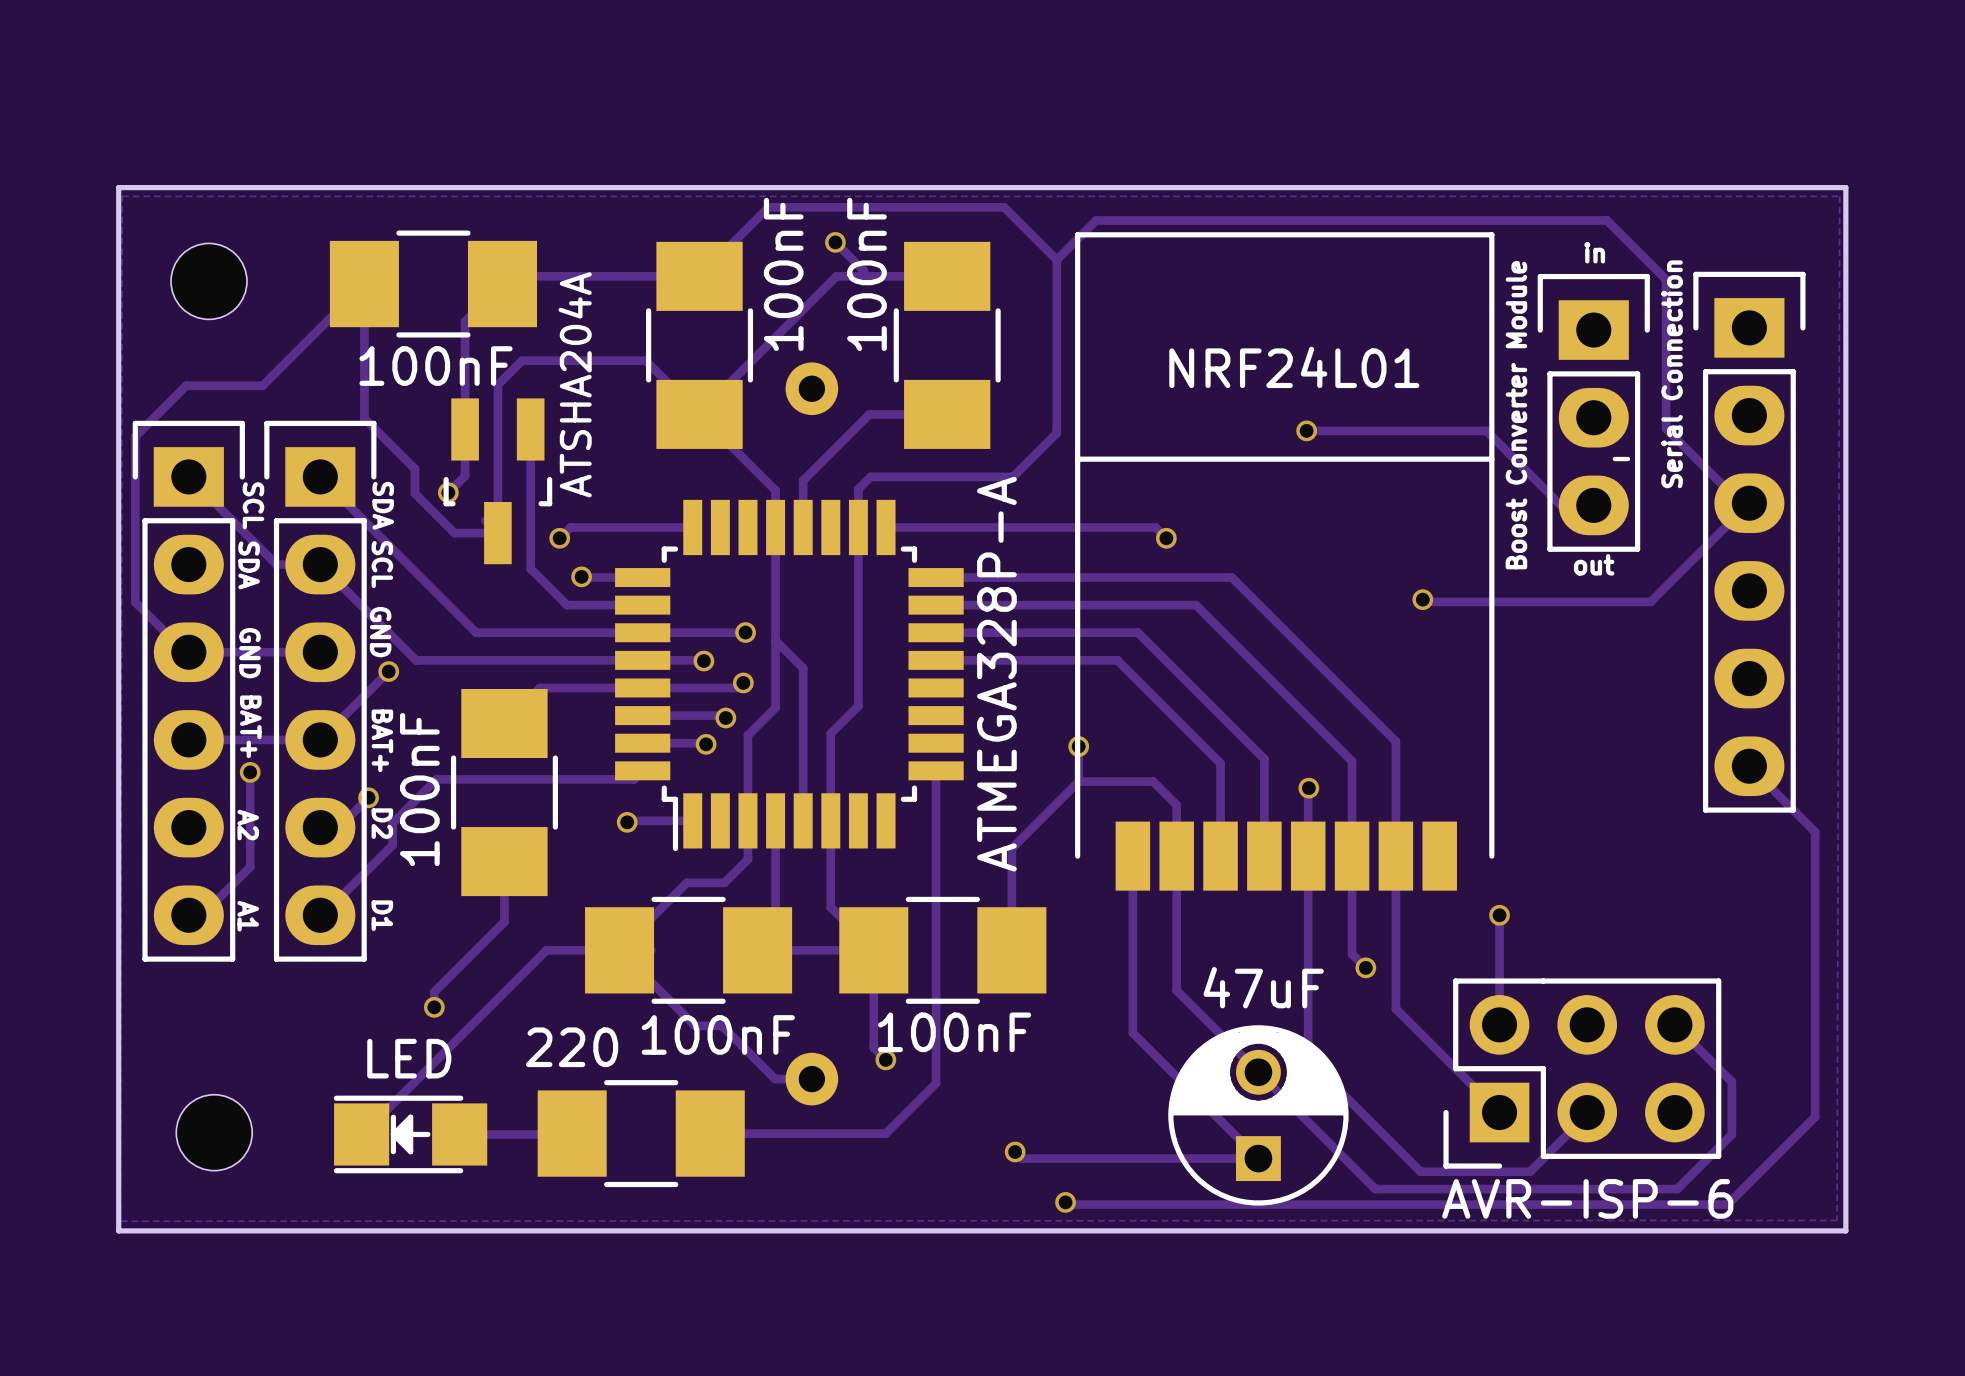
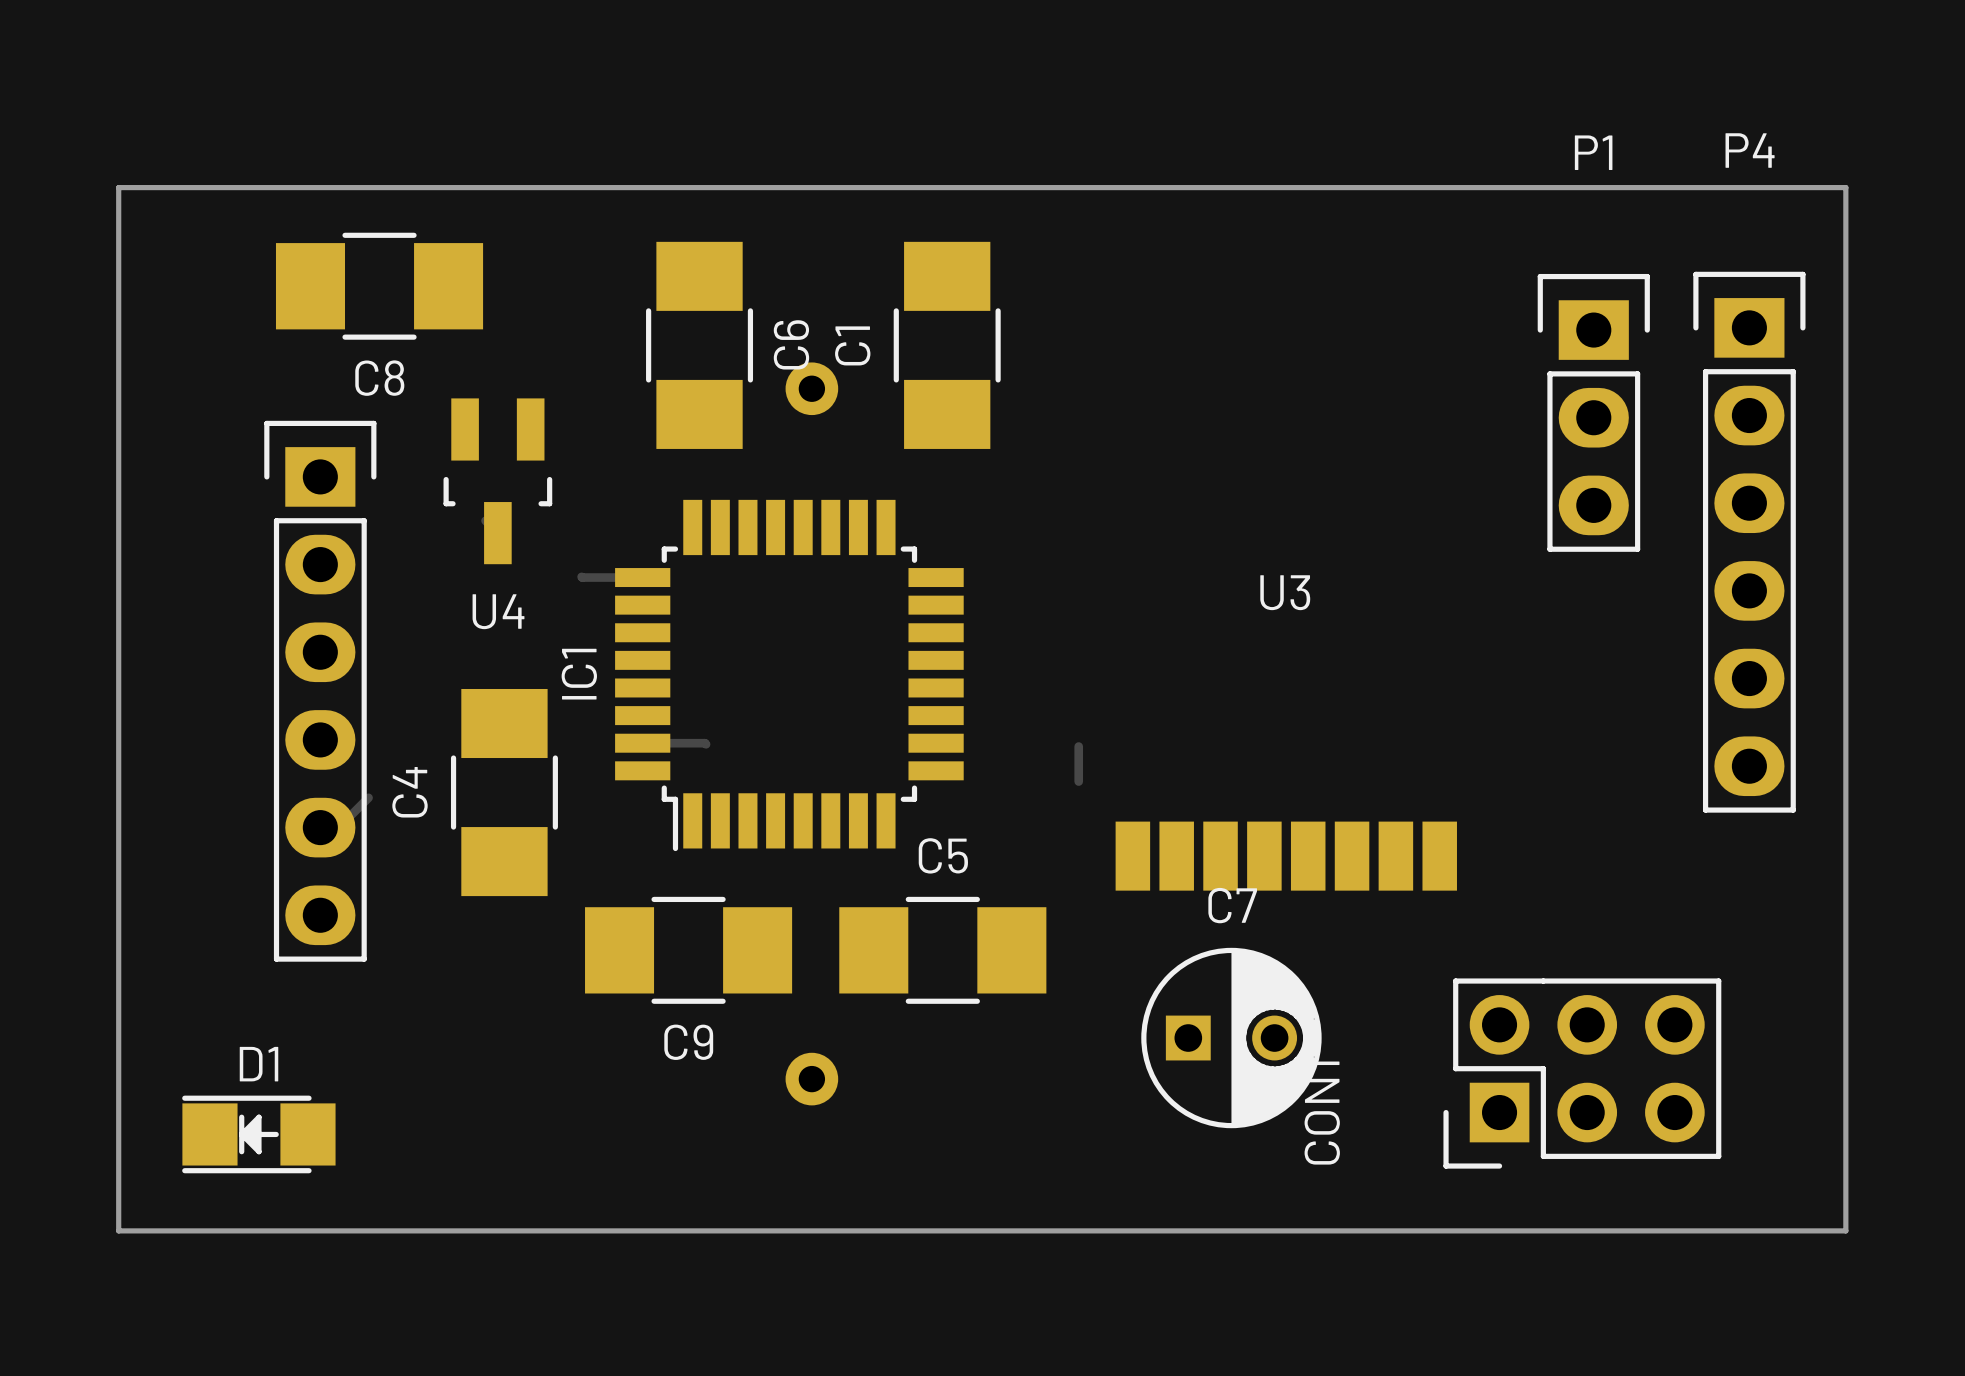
P4 name: none -> P4 (1750, 150)
P1 name: none -> P1 (1593, 152)
zone outline: (122, 196) (1839, 196) (1837, 1220) (120, 1221) (122, 196) -> none
track: (835, 242) (863, 270) (863, 276) -> none
via: (835, 242) -> none
text: in (1594, 252) -> none
track: (1056, 259) (1096, 220) (1606, 220) (1666, 279) (1666, 428) (1740, 503) (1749, 503) (1650, 601) (1425, 601) (1422, 599) -> none
track: (1056, 259) (1004, 207) (768, 207) (689, 286) -> none
track: (1056, 259) (1056, 433) (1012, 476) (870, 476) (858, 488) (858, 705) (830, 733) (830, 907) (873, 950) -> none
C6 value: 100nF (783, 274) -> none
C1 value: 100nF (867, 274) -> none
track: (699, 276) (510, 276) (465, 321) (465, 475) (448, 492) -> none
track: (947, 276) (836, 276) (699, 413) -> none
part: (209, 281) -> none
part: 100nF (433, 284) -> none
C8: none -> (379, 286)
C6 name: none -> C6 (791, 344)
C1 name: none -> C1 (852, 345)
text: Serial Connection (1672, 374) -> none
U4 value: ATSHA204A (575, 384) -> none
track: (947, 414) (869, 414) (803, 480) (803, 527) -> none
P1 value: Boost Converter Module (1516, 415) -> none
track: (530, 429) (530, 568) (566, 605) (642, 605) -> none
track: (1306, 430) (1486, 430) (1560, 505) (1593, 505) -> none
via: (1306, 430) -> none
text: - (1621, 459) -> none
track: (188, 476) (276, 564) (320, 564) (416, 660) (703, 661) -> none
track: (320, 476) (476, 632) (745, 632) -> none
via: (448, 492) -> none
text: SCL (253, 505) -> none
text: SDA (383, 505) -> none
track: (692, 527) (570, 527) (559, 538) -> none
track: (886, 527) (1155, 527) (1166, 538) -> none
via: (559, 538) -> none
via: (1166, 538) -> none
part: NRF24L01 (1284, 561) -> none
text: SCL (382, 564) -> none
text: out (1594, 564) -> none
text: SDA (249, 565) -> none
via: (581, 576) -> none
track: (936, 577) (1231, 577) (1395, 741) (1395, 1008) (1499, 1112) -> none
via: (1422, 599) -> none
track: (936, 605) (1195, 605) (1352, 761) (1352, 954) (1365, 967) -> none
U4 name: none -> U4 (498, 611)
text: GND (380, 632) -> none
via: (745, 632) -> none
track: (936, 632) (1138, 632) (1264, 759) (1264, 856) -> none
track: (775, 640) (803, 668) (803, 820) -> none
track: (320, 652) (185, 652) (135, 602) (135, 436) (186, 385) (262, 385) (364, 284) (364, 418) (415, 469) (415, 493) (454, 533) (497, 533) (497, 384) (521, 360) (645, 360) (775, 490) (775, 707) (747, 735) (747, 859) (724, 882) (686, 882) (619, 950) (694, 1025) (721, 1025) (775, 1079) (811, 1079) -> none
text: GND (249, 653) -> none
track: (936, 660) (1117, 660) (1220, 763) (1220, 856) -> none
via: (703, 661) -> none
track: (388, 671) (320, 739) (188, 739) -> none
via: (388, 671) -> none
IC1 name: none -> IC1 (579, 674)
IC1 value: ATMEGA328P-A (996, 674) -> none
track: (743, 682) (738, 687) (539, 687) (504, 723) -> none
via: (743, 682) -> none
part: (188, 691) -> none
track: (642, 715) (723, 715) (725, 718) -> none
via: (725, 718) -> none
text: BAT+ (250, 726) -> none
text: BAT+ (382, 740) -> none
via: (706, 744) -> none
via: (1078, 746) -> none
track: (1749, 766) (1815, 831) (1815, 1116) (1727, 1204) (1067, 1204) (1065, 1202) -> none
track: (936, 770) (936, 1083) (885, 1133) (710, 1133) -> none
track: (250, 772) (250, 867) (201, 915) (188, 915) -> none
via: (250, 772) -> none
track: (642, 774) (642, 770) (634, 779) (436, 779) (392, 823) (392, 845) (322, 915) (320, 915) -> none
track: (1308, 788) (1308, 1059) (1420, 1171) (1530, 1171) (1587, 1114) -> none
via: (1308, 788) -> none
C4 value: 100nF (419, 789) -> none
C4 name: none -> C4 (410, 792)
via: (368, 797) -> none
track: (692, 820) (627, 822) -> none
track: (775, 820) (775, 932) (757, 950) (873, 950) -> none
via: (627, 822) -> none
text: D2 (382, 823) -> none
text: A2 (248, 825) -> none
C5 name: none -> C5 (943, 855)
track: (1132, 856) (1132, 1032) (1258, 1158) (1021, 1158) (1015, 1151) -> none
U3: none -> (1286, 856)
track: (504, 861) (504, 921) (434, 991) (434, 1007) -> none
text: D1 (382, 915) -> none
track: (1499, 915) (1499, 1024) -> none
via: (1499, 915) -> none
text: A1 (248, 916) -> none
track: (651, 950) (546, 950) (362, 1134) (361, 1132) -> none
track: (873, 950) (873, 1047) (885, 1059) -> none
track: (1011, 950) (1011, 848) (1078, 781) (1153, 781) (1176, 805) (1176, 990) (1375, 1189) (1677, 1189) (1731, 1134) (1731, 1081) (1674, 1024) (1685, 1024) -> none
via: (1365, 967) -> none
via: (434, 1007) -> none
C5 value: 100nF (954, 1032) -> none
C9 value: 100nF (718, 1034) -> none
C7: none -> (1231, 1038)
C9 name: none -> C9 (688, 1042)
via: (885, 1059) -> none
CON1 name: none -> CON1 (1322, 1113)
part: 47uF (1258, 1115) -> none
part: (214, 1132) -> none
track: (572, 1133) (459, 1134) -> none
part: 220 (641, 1133) -> none
D1: none -> (258, 1134)
part: LED (410, 1134) -> none
via: (1015, 1151) -> none
CON1 value: AVR-ISP-6 (1587, 1198) -> none
via: (1065, 1202) -> none

